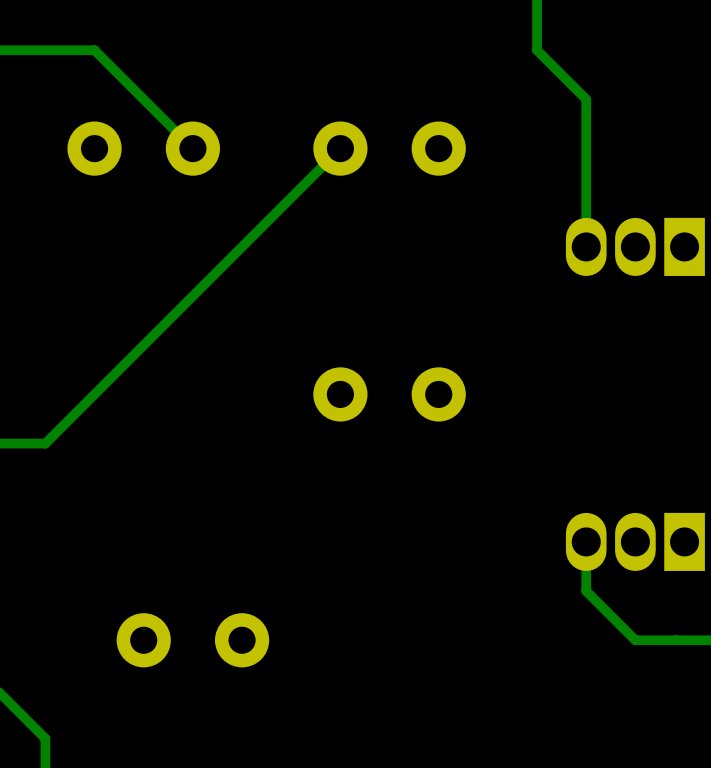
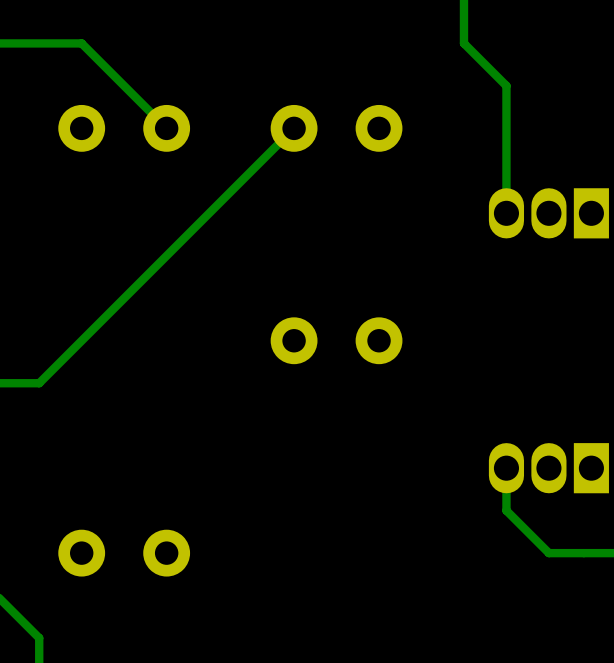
part position: (192, 640) -> (124, 553)

